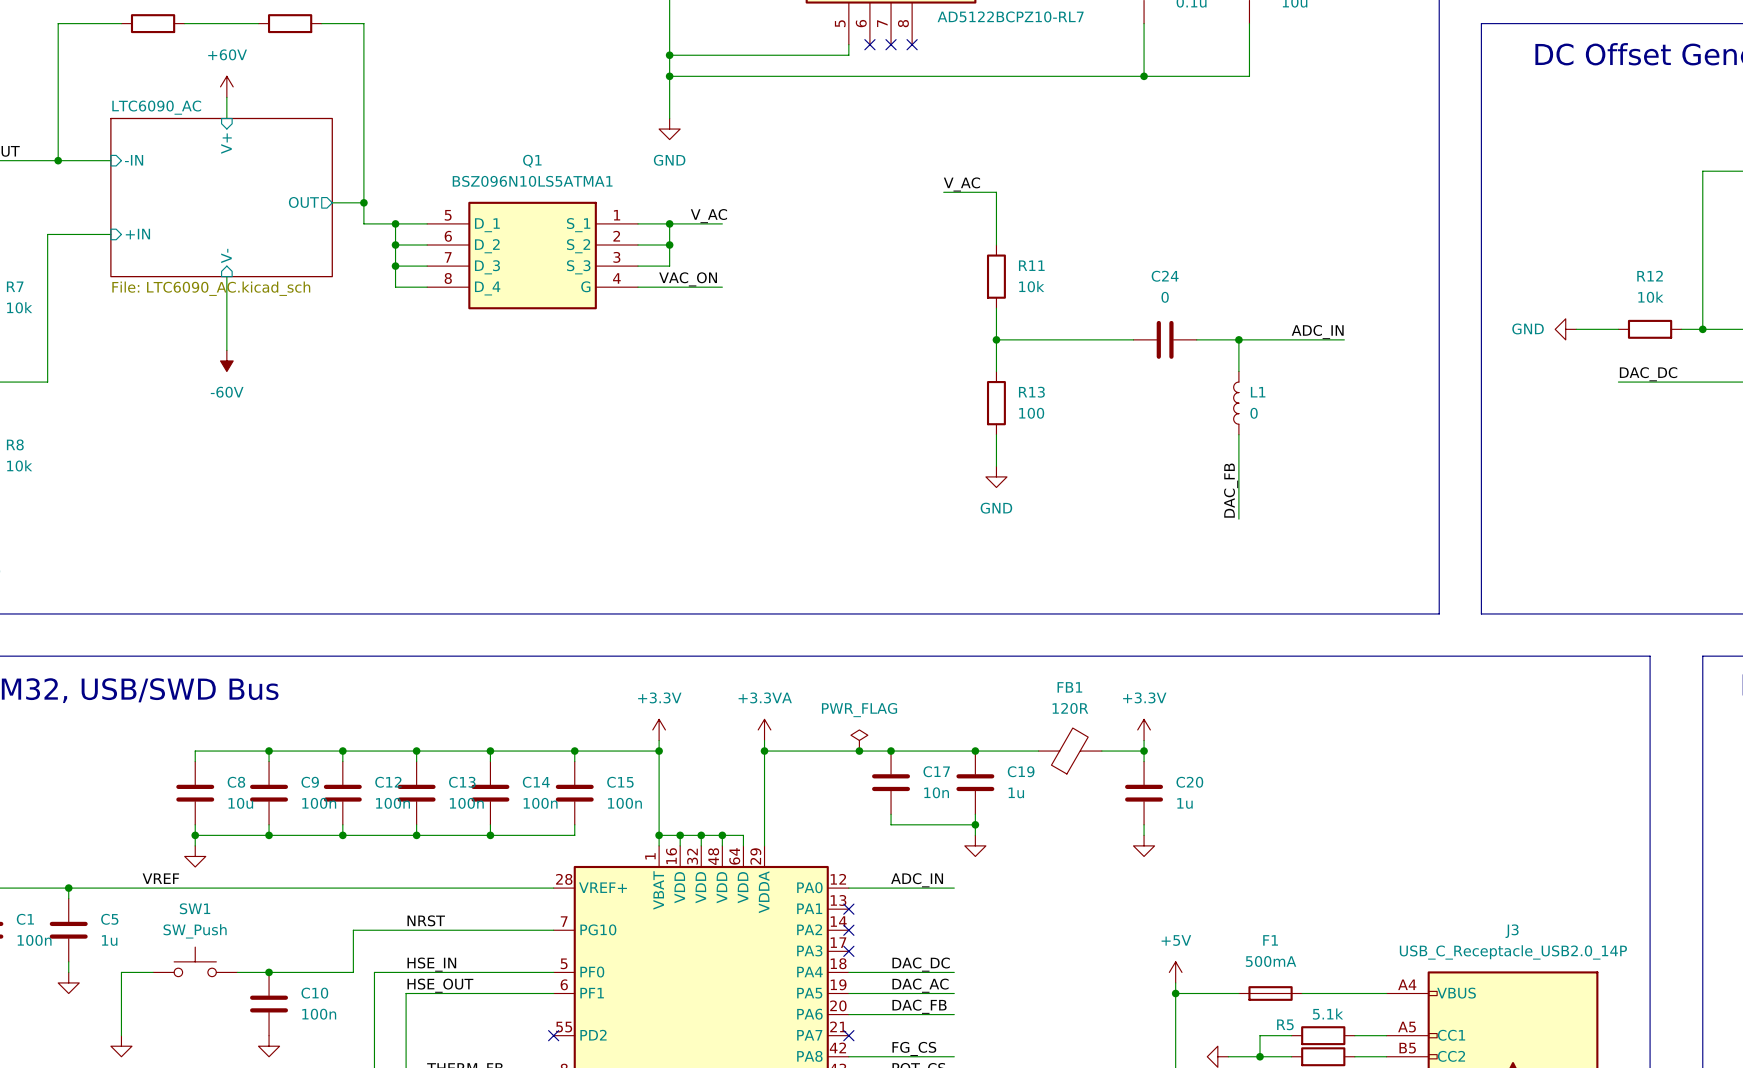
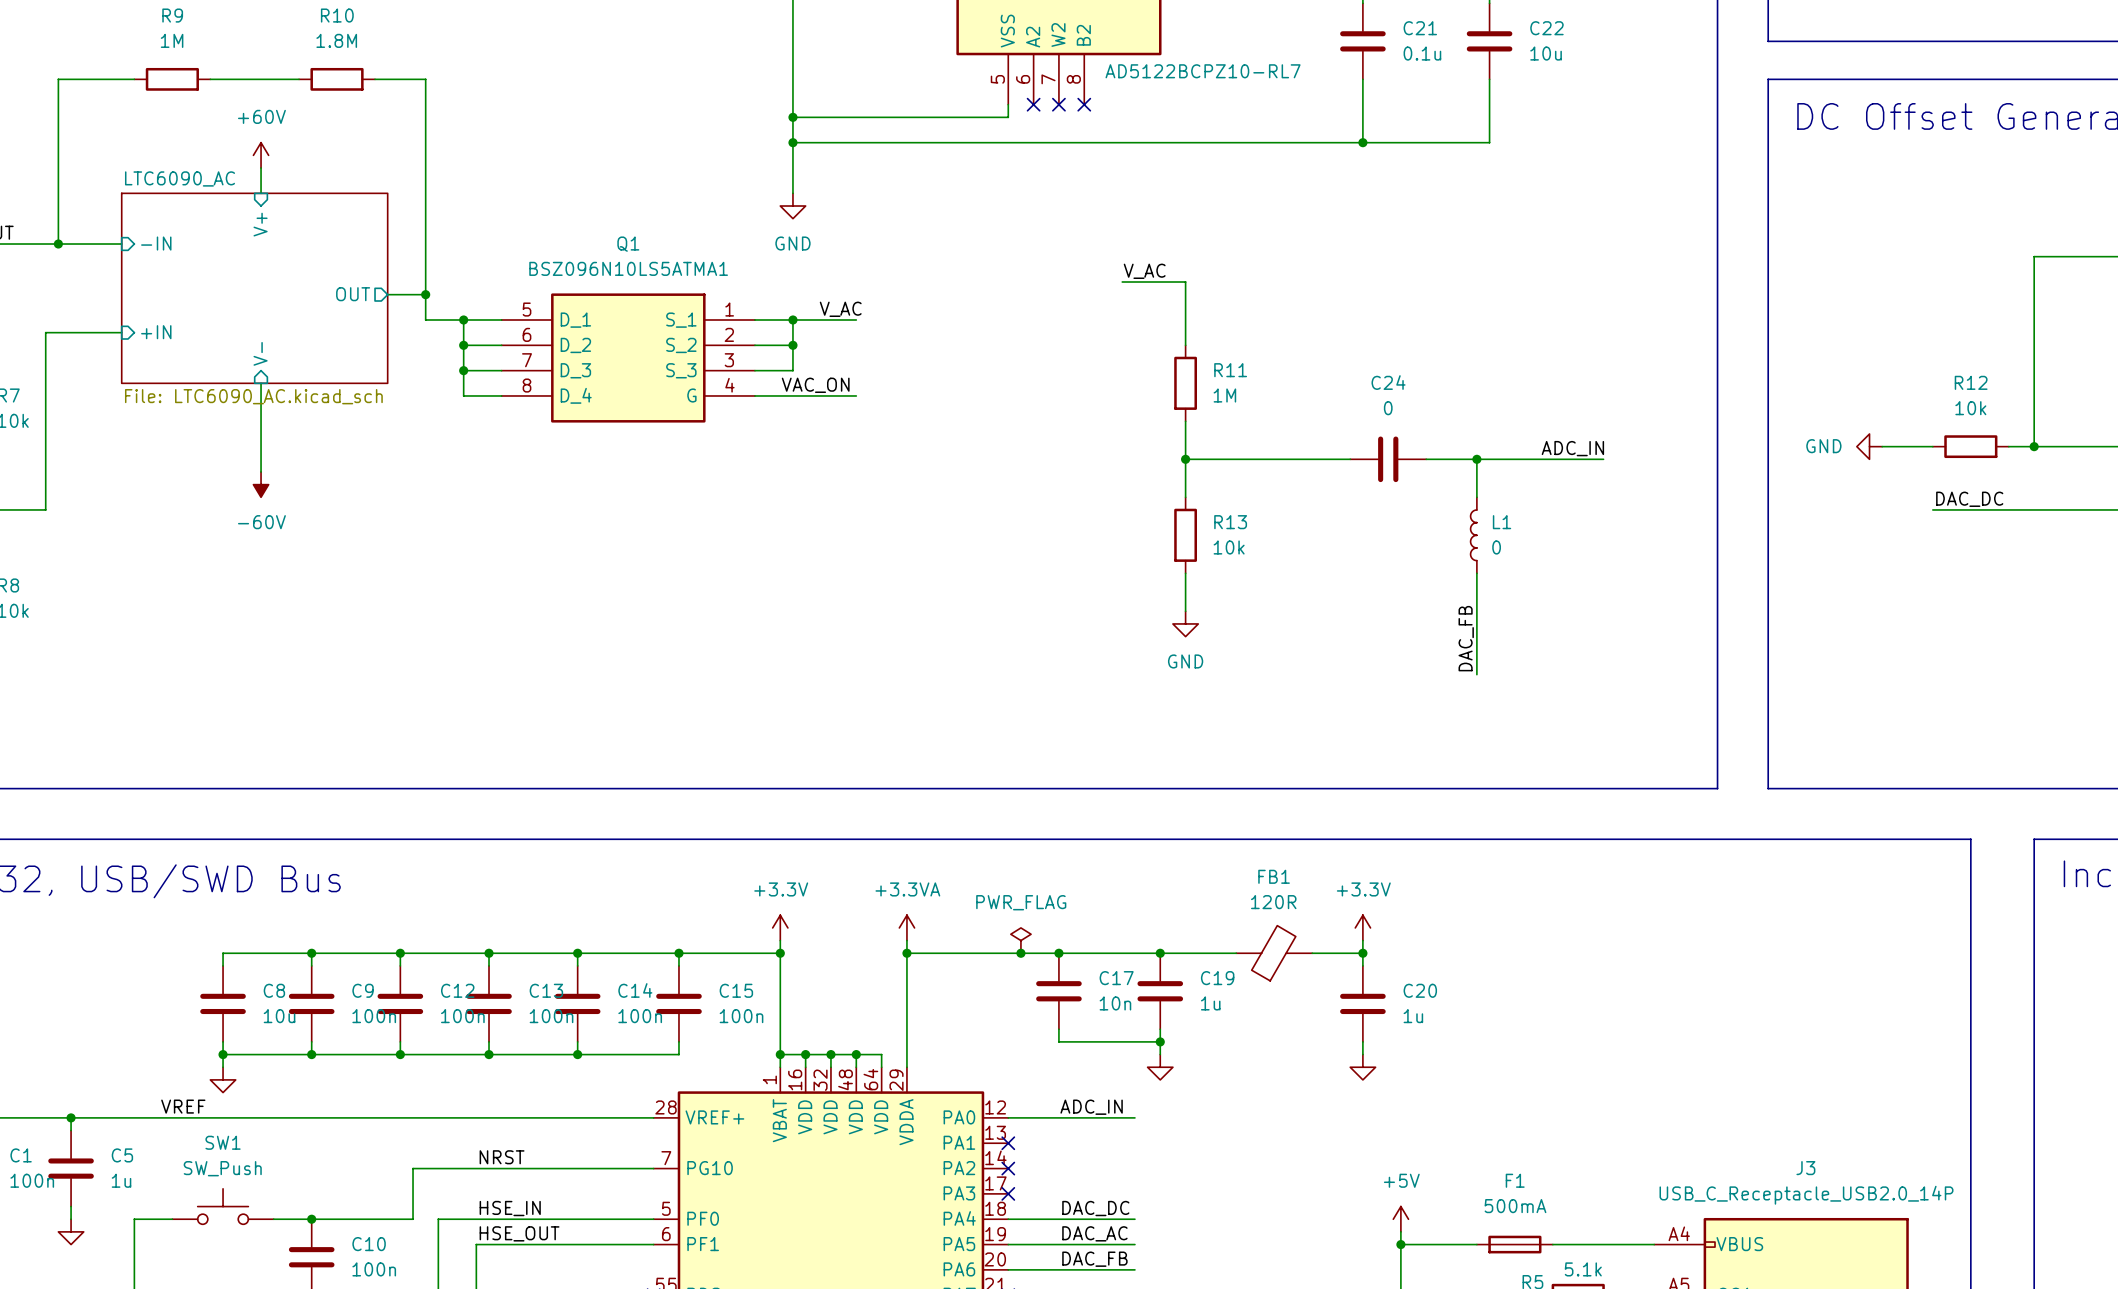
R11 value: 10k (1031, 286) -> 1M (1224, 395)
R13 value: 100 (1031, 413) -> 10k (1229, 547)

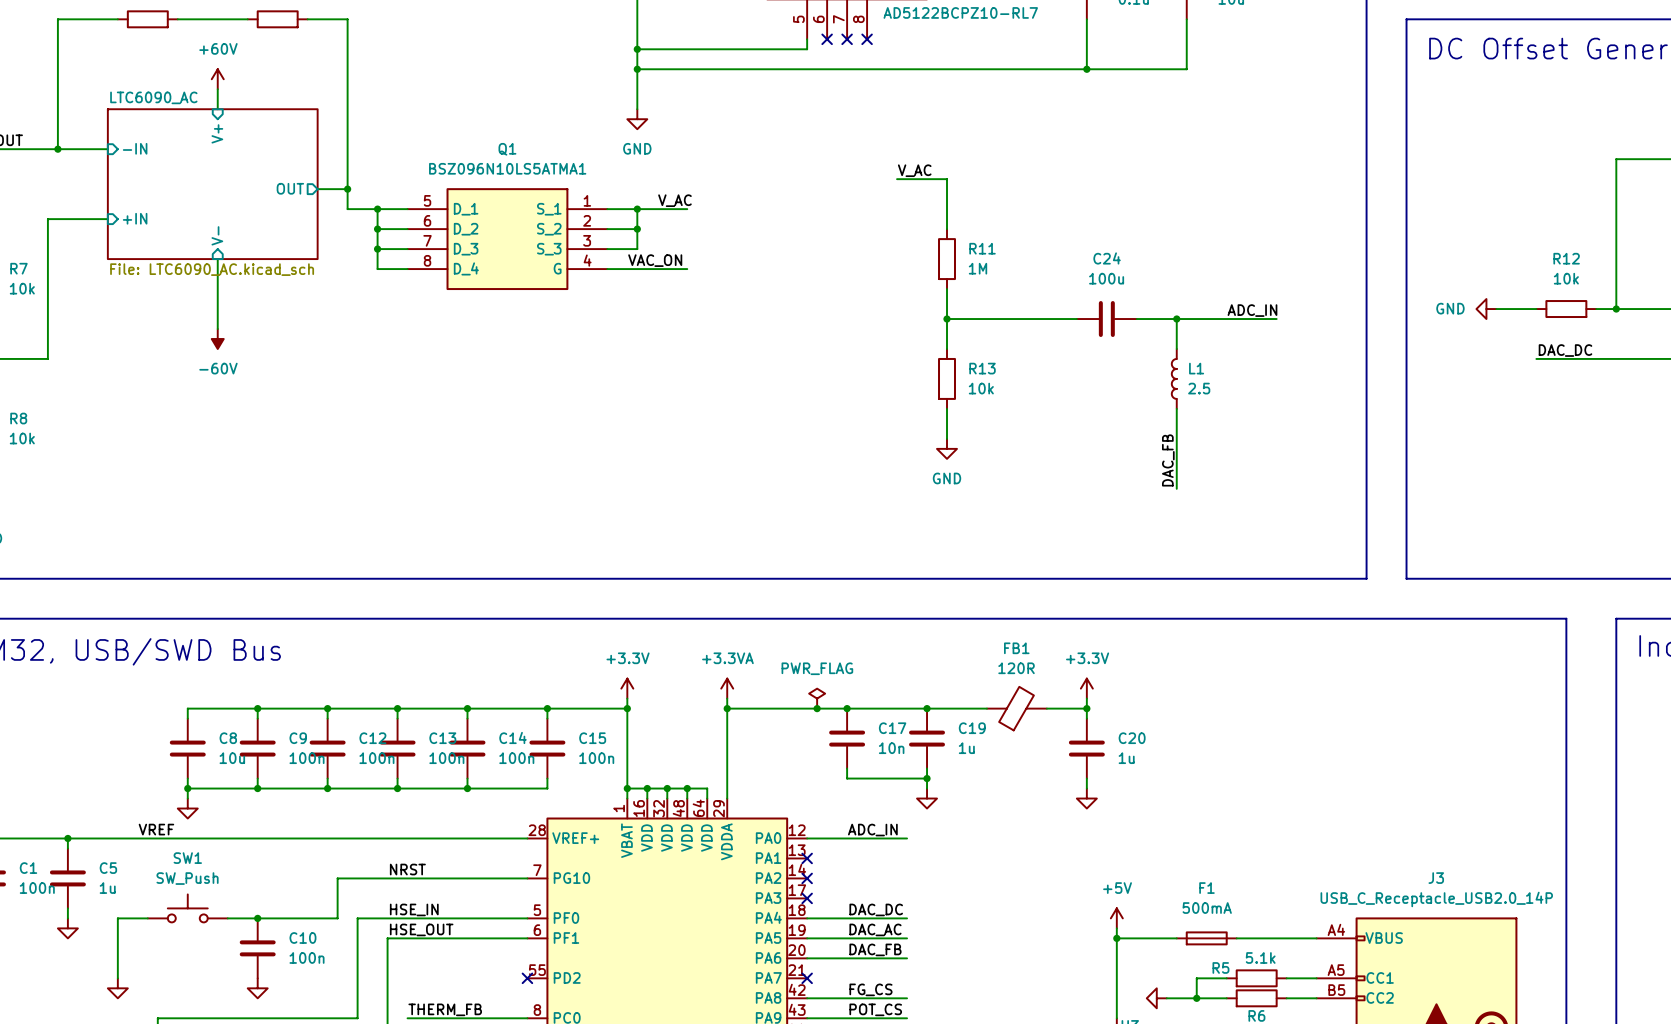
C24 value: 0 (1388, 408) -> 100u (1106, 278)
L1 value: 0 (1496, 547) -> 2.5 (1199, 388)

